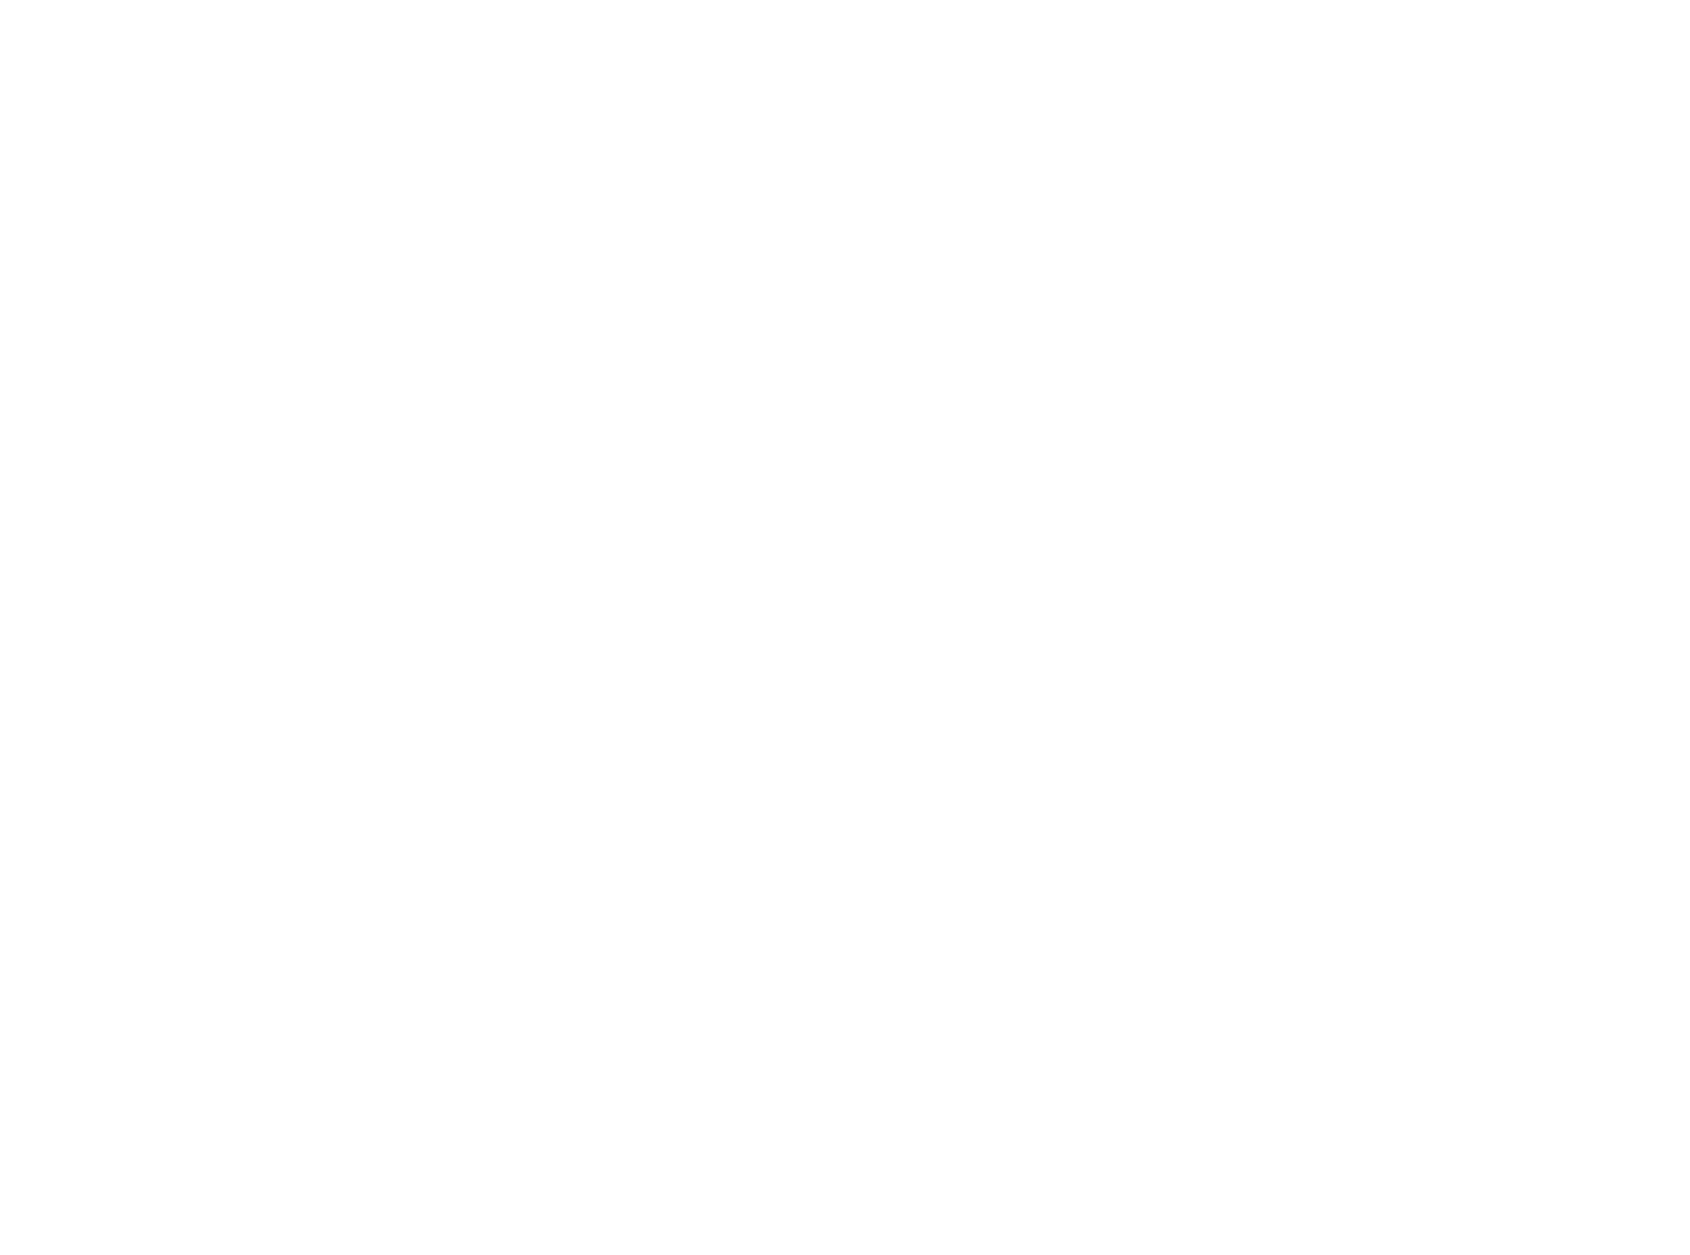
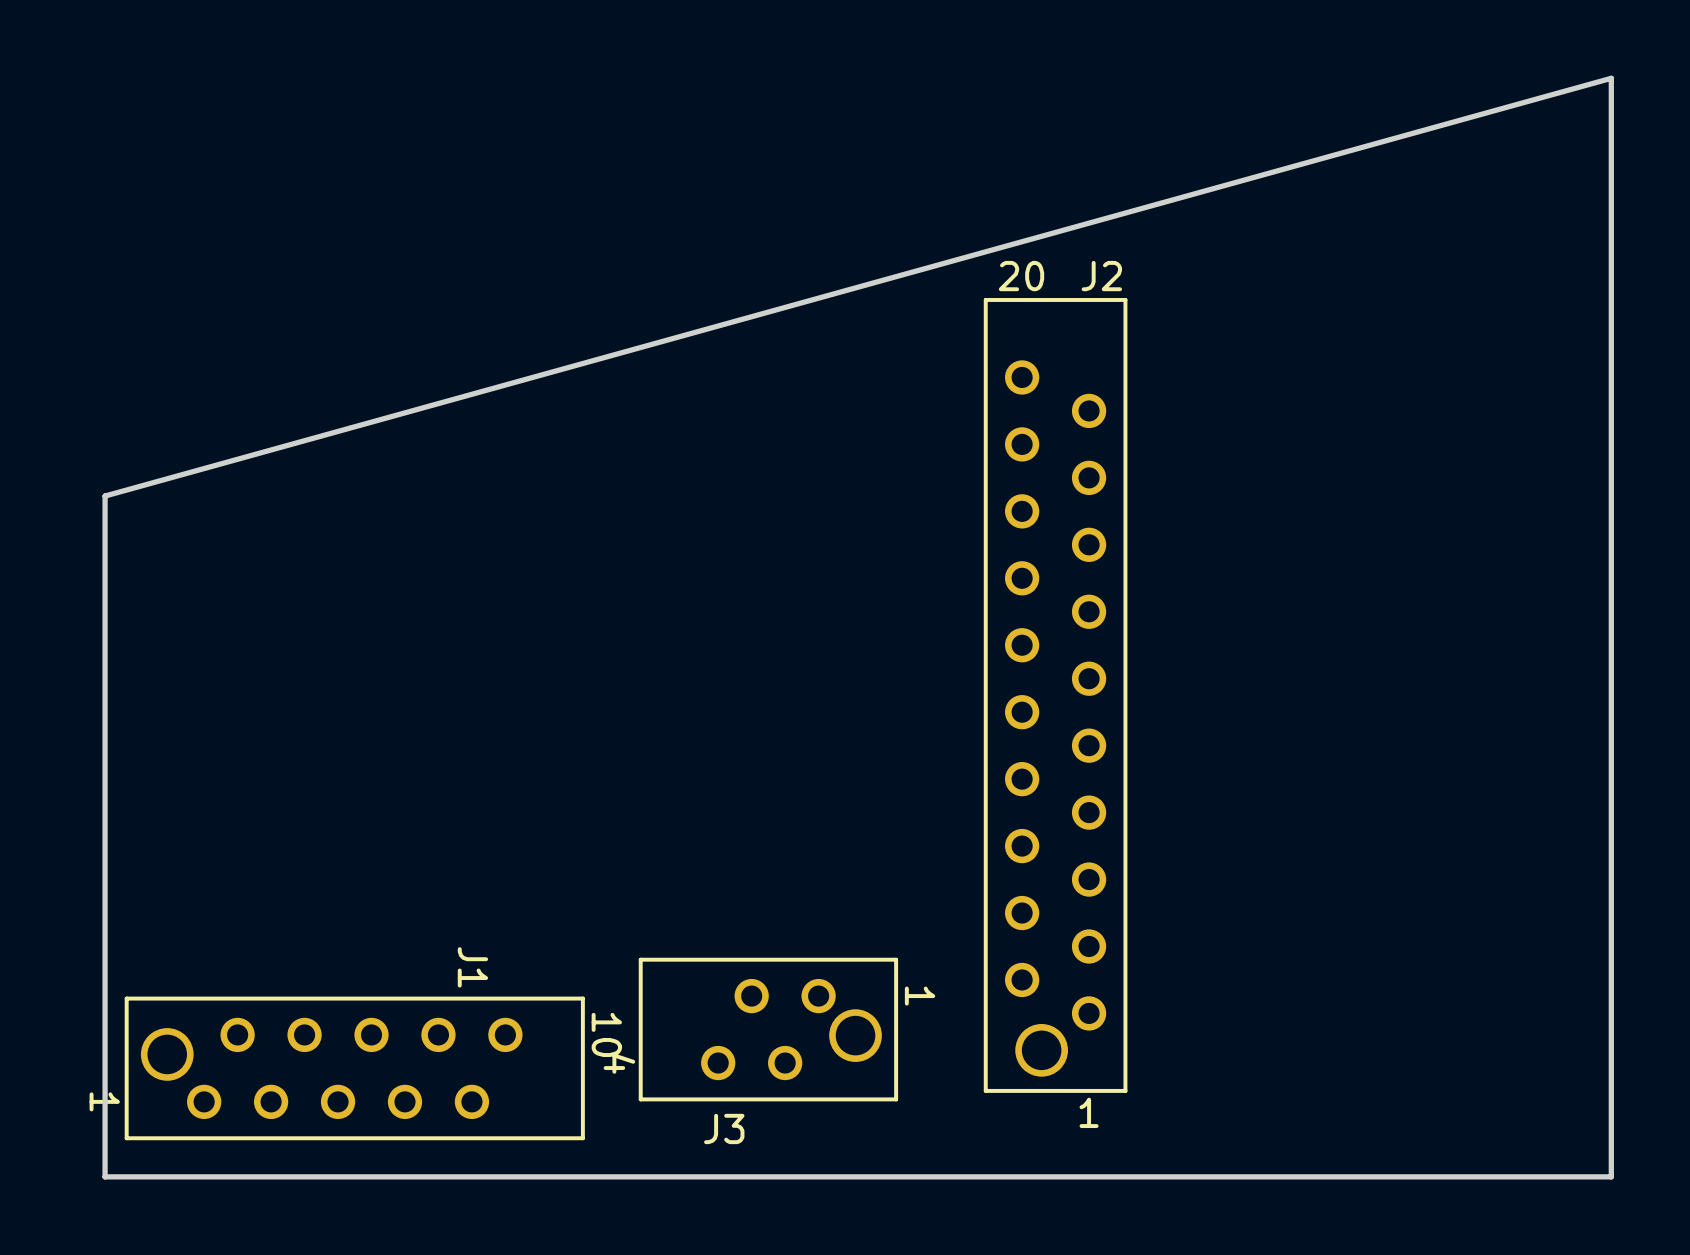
board edge: none -> (1611, 78) (1611, 1176) (105, 1176) (105, 496) (1611, 78)
J2: none -> (1055, 695)
J3: none -> (768, 1029)
J1: none -> (354, 1068)

